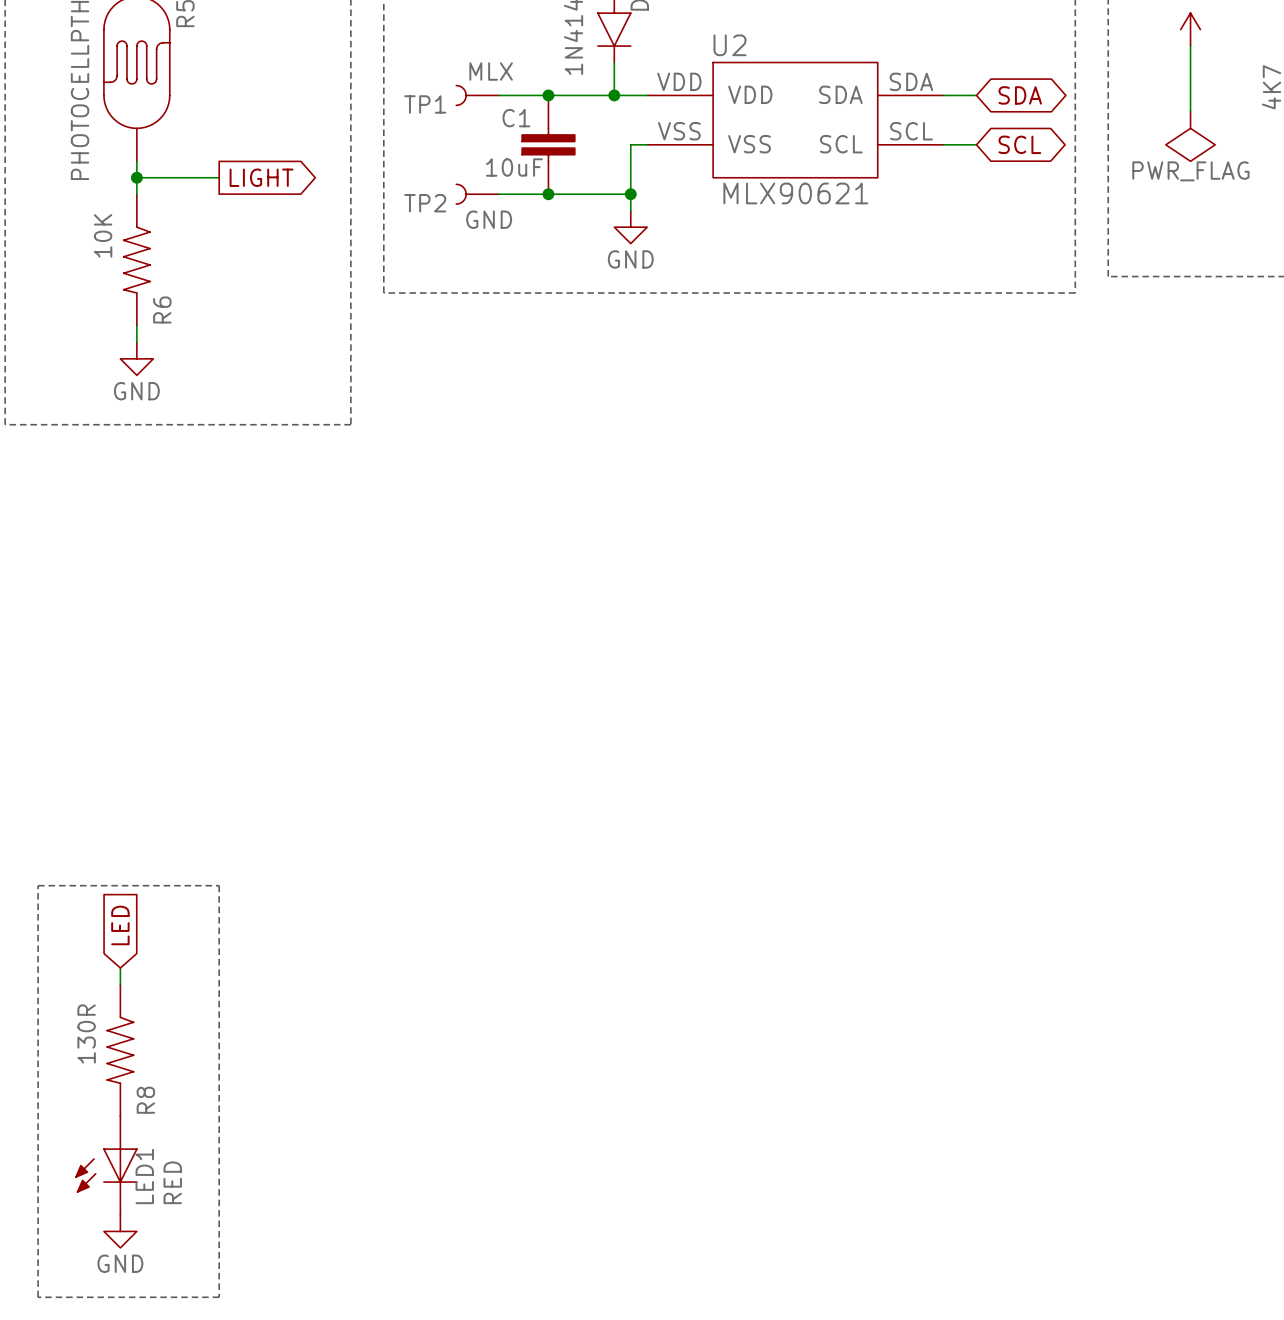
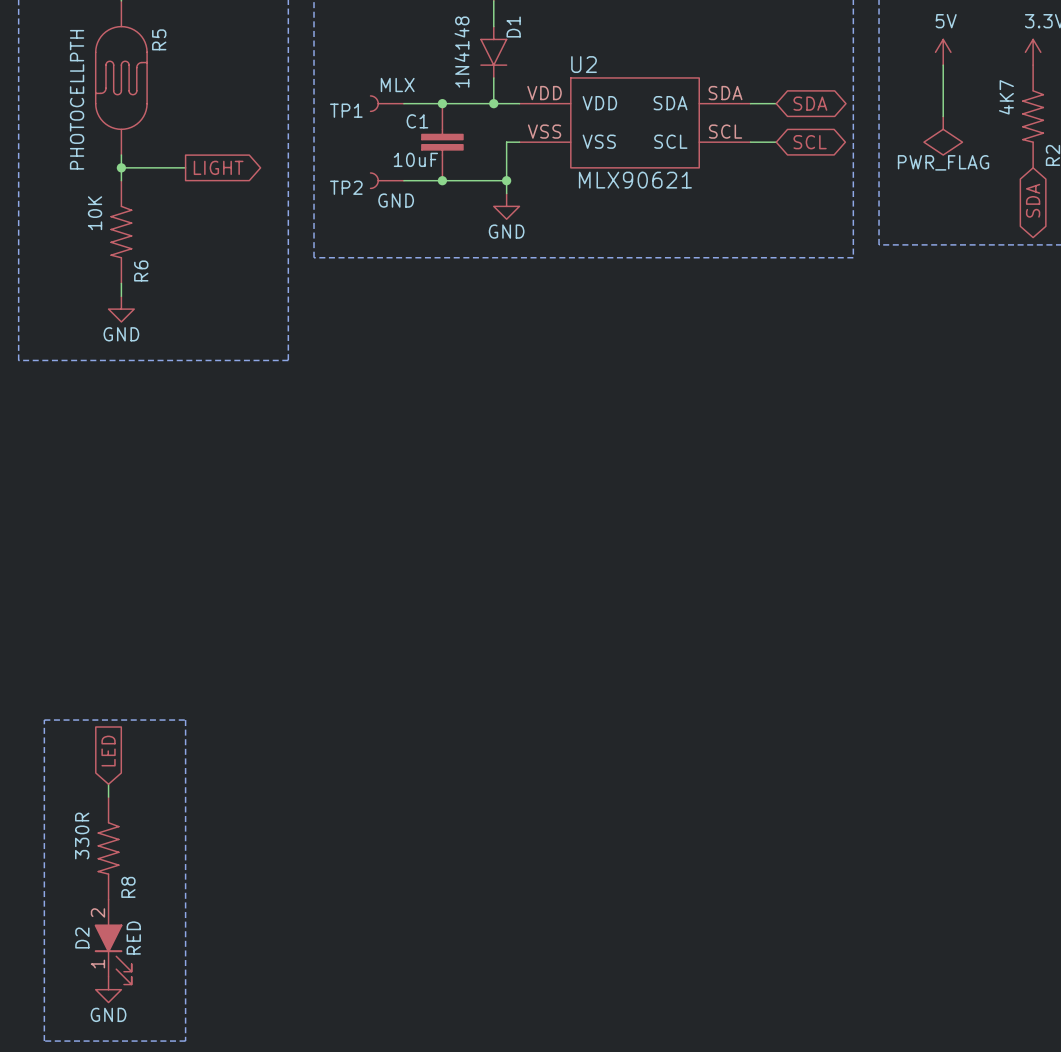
R8 value: 130R (86, 1033) -> 330R (82, 836)
LED1: RED (106, 1165) -> none
D2: none -> RED (113, 942)

